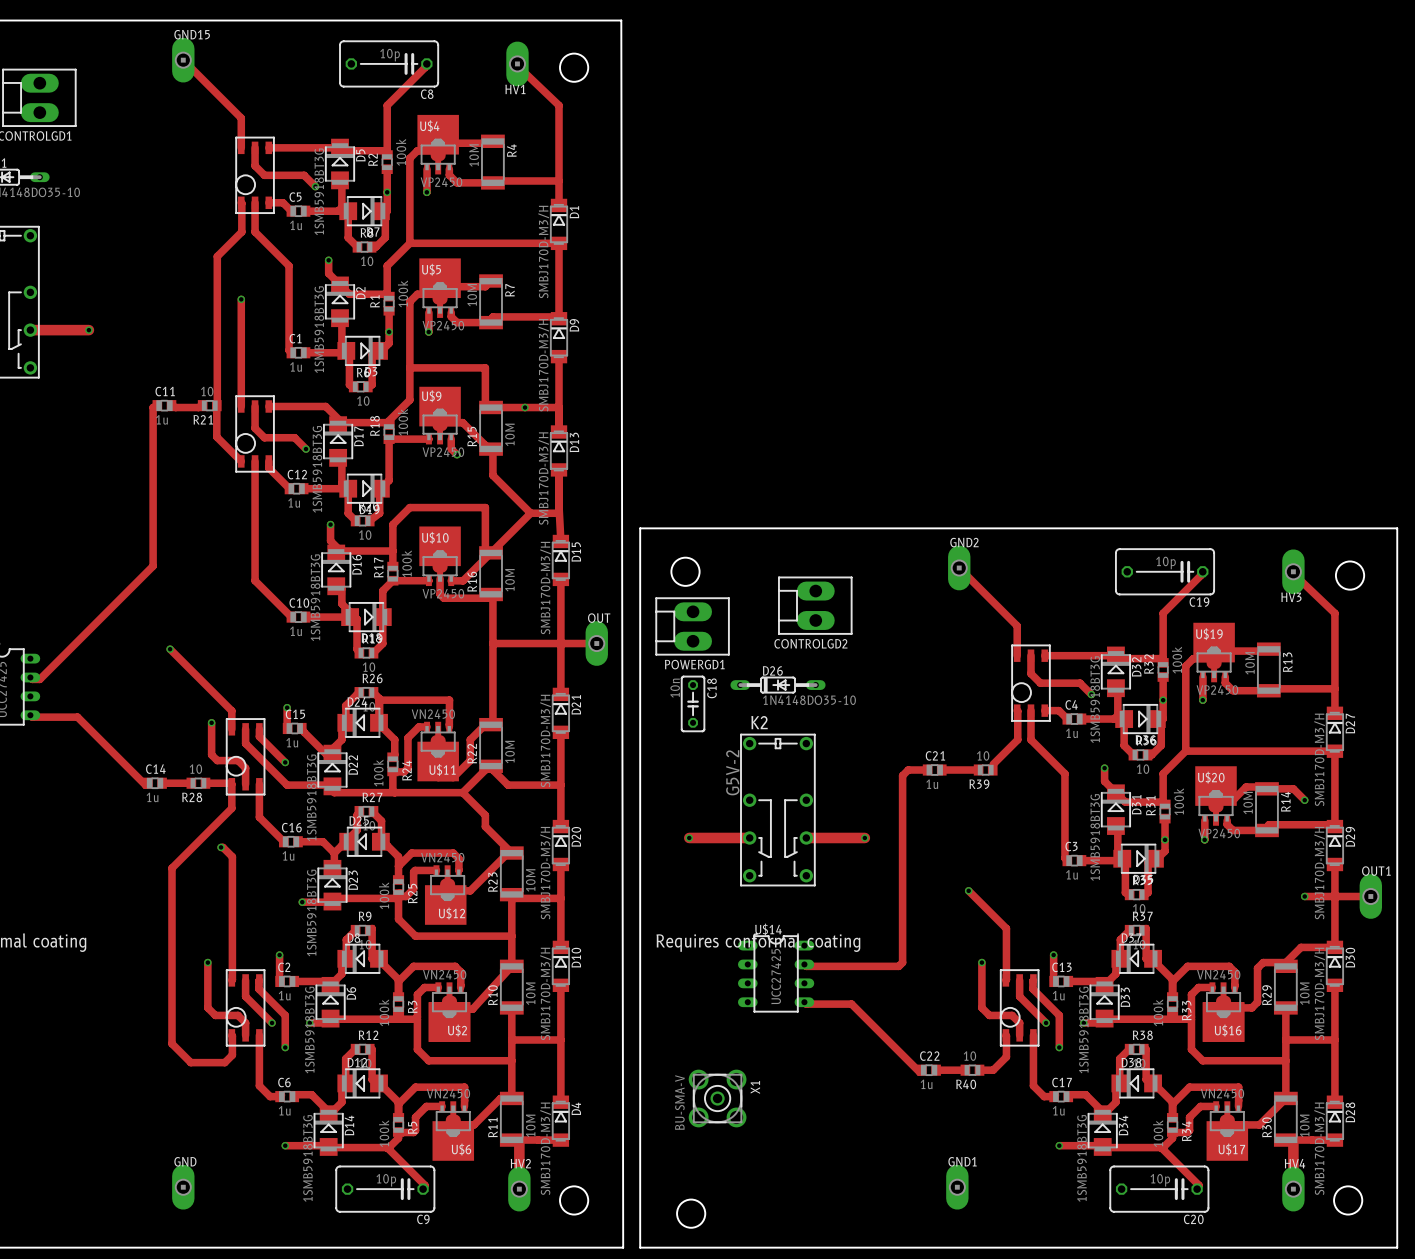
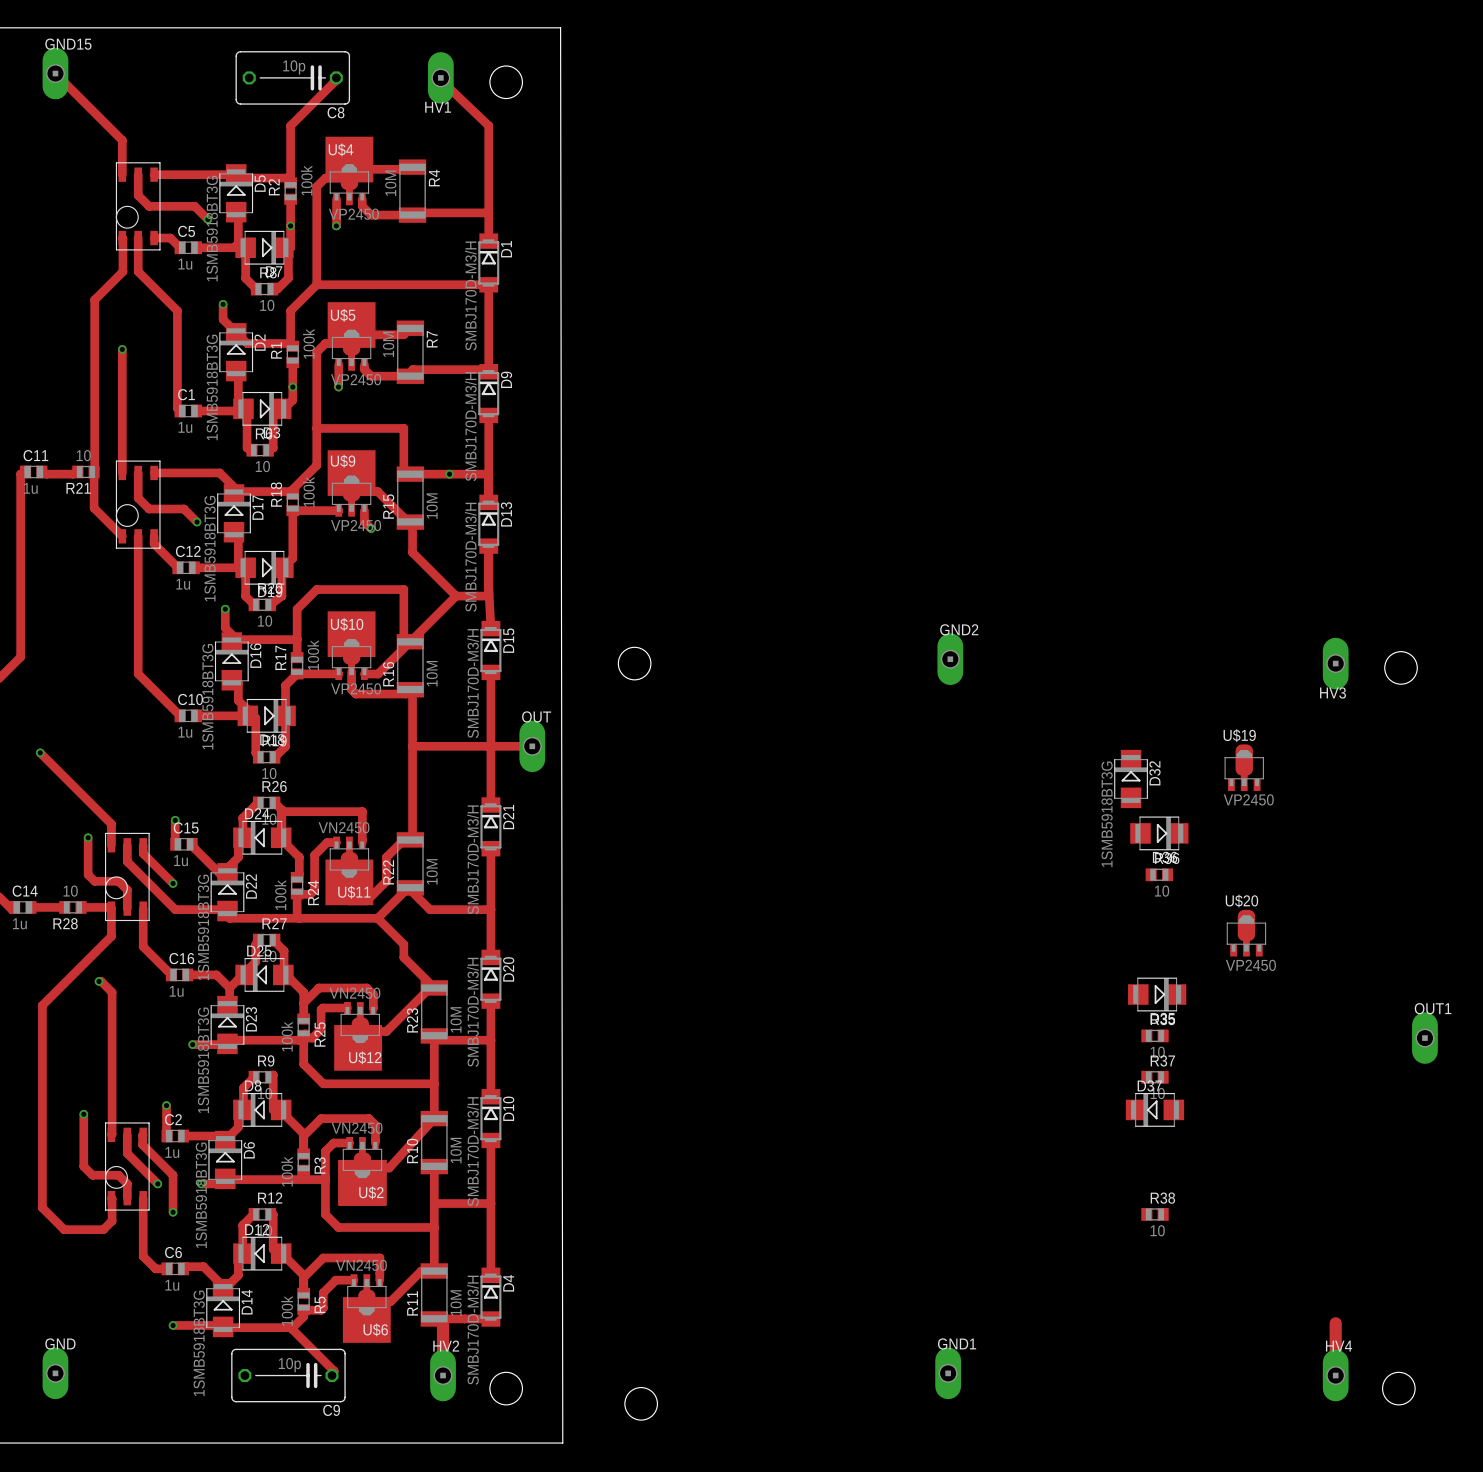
board edge: (640, 528) (1397, 528) (1397, 1247) (640, 1247) (640, 528) -> none
track: (959, 568) (1017, 625) (1017, 655) -> none
C19: 10p (1165, 571) -> none
track: (1202, 571) (1163, 613) (1163, 662) -> none
track: (1293, 573) (1334, 613) (1334, 713) -> none
CONTROLGD2: (815, 605) -> none
drawing: [1193, 622, 1235, 663] -> none
POWERGD1: (692, 626) -> none
track: (1268, 649) (1268, 651) (1216, 651) (1214, 655) (1208, 658) (1193, 658) (1185, 666) (1185, 751) -> none
track: (1030, 655) (1030, 673) (1040, 683) (1080, 683) (1091, 694) -> none
track: (1044, 655) (1115, 655) (1117, 658) (1163, 658) -> none
R32: 100k (1163, 669) -> none
R13: 10M (1268, 669) -> none
track: (1163, 677) (1163, 719) (1156, 719) -> none
track: (1202, 677) (1202, 700) -> none
track: (1225, 677) (1225, 682) (1232, 690) (1265, 690) -> none
part: (1030, 683) -> none
D26: 1N4148DO35-10 (778, 685) -> none
track: (1115, 688) (1117, 688) (1117, 719) (1124, 719) (1124, 745) (1133, 754) -> none
track: (1334, 688) (1268, 688) (1268, 690) -> none
via: (1091, 694) -> none
via: (1163, 700) -> none
via: (1202, 700) -> none
C18: 10n (693, 703) -> none
track: (1017, 710) (1017, 739) (993, 764) -> none
track: (1030, 710) (1030, 739) (1064, 773) (1064, 858) (1067, 860) -> none
track: (1044, 710) (1058, 710) (1067, 719) -> none
track: (1117, 715) (1114, 719) (1081, 719) -> none
C4: 1u (1074, 719) -> none
track: (1161, 719) (1161, 745) (1151, 754) (1147, 754) -> none
D27: SMBJ170D-M3/H (1334, 732) -> none
track: (1185, 751) (1163, 773) (1163, 802) -> none
track: (1185, 751) (1334, 751) (1334, 826) -> none
drawing: [1195, 766, 1237, 806] -> none
track: (1104, 768) (1104, 781) (1125, 802) (1163, 802) -> none
via: (1104, 768) -> none
track: (927, 770) (908, 770) (902, 775) (902, 962) (898, 966) (806, 966) (804, 964) -> none
C21: 1u (934, 770) -> none
track: (941, 770) (978, 770) -> none
R39: 10 (985, 770) -> none
track: (1216, 798) (1234, 798) (1246, 787) (1265, 787) (1266, 788) (1293, 788) (1304, 800) -> none
via: (1304, 800) -> none
D31: 1SMB5918BT3G (1115, 809) -> none
R14: 10M (1266, 809) -> none
K2: G5V-2 (777, 810) -> none
R31: 100k (1165, 811) -> none
track: (1165, 818) (1165, 851) (1157, 858) (1148, 862) (1148, 892) (1143, 894) -> none
track: (1204, 820) (1204, 839) -> none
track: (1227, 820) (1227, 824) (1232, 830) (1266, 830) -> none
track: (1334, 824) (1268, 824) (1266, 830) -> none
track: (1115, 826) (1117, 854) (1125, 862) (1125, 892) (1129, 894) -> none
track: (689, 837) (749, 837) -> none
via: (689, 837) -> none
track: (806, 837) (864, 837) -> none
via: (864, 837) -> none
via: (1165, 839) -> none
via: (1204, 839) -> none
D29: SMBJ170D-M3/H (1334, 845) -> none
C3: 1u (1074, 860) -> none
track: (1081, 860) (1117, 860) -> none
track: (1334, 864) (1334, 947) (1301, 947) (1285, 962) (1263, 962) (1257, 968) (1257, 1002) (1251, 1007) (1219, 1007) -> none
track: (968, 890) (1006, 928) (1005, 980) -> none
via: (968, 890) -> none
track: (1304, 896) (1370, 896) -> none
via: (1304, 896) -> none
track: (1129, 930) (1120, 939) (1120, 958) (1115, 958) (1115, 973) (1104, 985) (1100, 981) (1068, 981) -> none
track: (1143, 930) (1146, 928) (1146, 958) (1153, 958) (1172, 979) (1172, 997) -> none
text: Requires conformal coating (758, 942) -> none
track: (1053, 955) (1053, 981) -> none
via: (1053, 955) -> none
track: (981, 962) (981, 1007) (989, 1015) (1012, 1015) (1019, 1022) (1019, 1035) -> none
via: (981, 962) -> none
D30: SMBJ170D-M3/H (1334, 966) -> none
U$14: UCC27425 (776, 973) -> none
track: (1019, 980) (1019, 996) (1046, 1022) -> none
track: (1033, 980) (1032, 989) (1059, 1015) (1059, 1047) -> none
C13: 1u (1061, 981) -> none
track: (1172, 981) (1187, 966) (1229, 966) (1234, 972) (1234, 987) -> none
track: (1334, 985) (1334, 1102) -> none
track: (1212, 987) (1198, 987) (1191, 994) (1191, 1017) (1189, 1019) -> none
R29: 10M (1285, 987) -> none
track: (804, 1002) (806, 1004) (851, 1004) (919, 1072) (921, 1070) -> none
D33: 1SMB5918BT3G (1104, 1002) -> none
drawing: [1202, 1002, 1245, 1042] -> none
U$16: VN2450 (1223, 1002) -> none
R33: 100k (1172, 1004) -> none
part: (1019, 1007) -> none
track: (1285, 1007) (1285, 1098) (1259, 1124) (1227, 1124) -> none
via: (1046, 1022) -> none
track: (1083, 1022) (1105, 1022) (1104, 1018) (1191, 1019) (1191, 1049) (1202, 1060) (1285, 1060) -> none
via: (1083, 1022) -> none
track: (1005, 1035) (1006, 1056) (993, 1070) (979, 1070) -> none
track: (1033, 1035) (1033, 1085) (1044, 1096) (1055, 1095) -> none
track: (1285, 1039) (1334, 1039) -> none
via: (1059, 1047) -> none
track: (1129, 1049) (1119, 1058) (1120, 1083) (1115, 1087) (1115, 1102) (1102, 1114) (1085, 1094) (1070, 1094) (1068, 1096) -> none
track: (1143, 1049) (1146, 1049) (1146, 1079) (1153, 1083) (1172, 1102) (1172, 1117) -> none
C22: 1u (929, 1070) -> none
track: (936, 1070) (965, 1070) -> none
R40: 10 (972, 1070) -> none
D38: (1136, 1083) -> none
C17: 1u (1061, 1096) -> none
X1: BU-SMA-V (717, 1098) -> none
track: (1172, 1104) (1189, 1087) (1238, 1087) (1238, 1106) -> none
track: (1216, 1106) (1200, 1106) (1189, 1117) (1189, 1130) (1187, 1132) (1172, 1132) (1172, 1138) (1162, 1148) -> none
R30: 10M (1285, 1119) -> none
drawing: [1206, 1121, 1249, 1161] -> none
U$17: VN2450 (1227, 1121) -> none
D28: SMBJ170D-M3/H (1334, 1121) -> none
R34: 100k (1172, 1124) -> none
D34: 1SMB5918BT3G (1102, 1130) -> none
track: (1285, 1140) (1280, 1140) (1334, 1140) -> none
track: (1059, 1145) (1104, 1145) (1106, 1147) -> none
via: (1059, 1145) -> none
track: (1102, 1146) (1161, 1147) (1199, 1185) (1197, 1189) -> none
C20: 10p (1159, 1189) -> none

